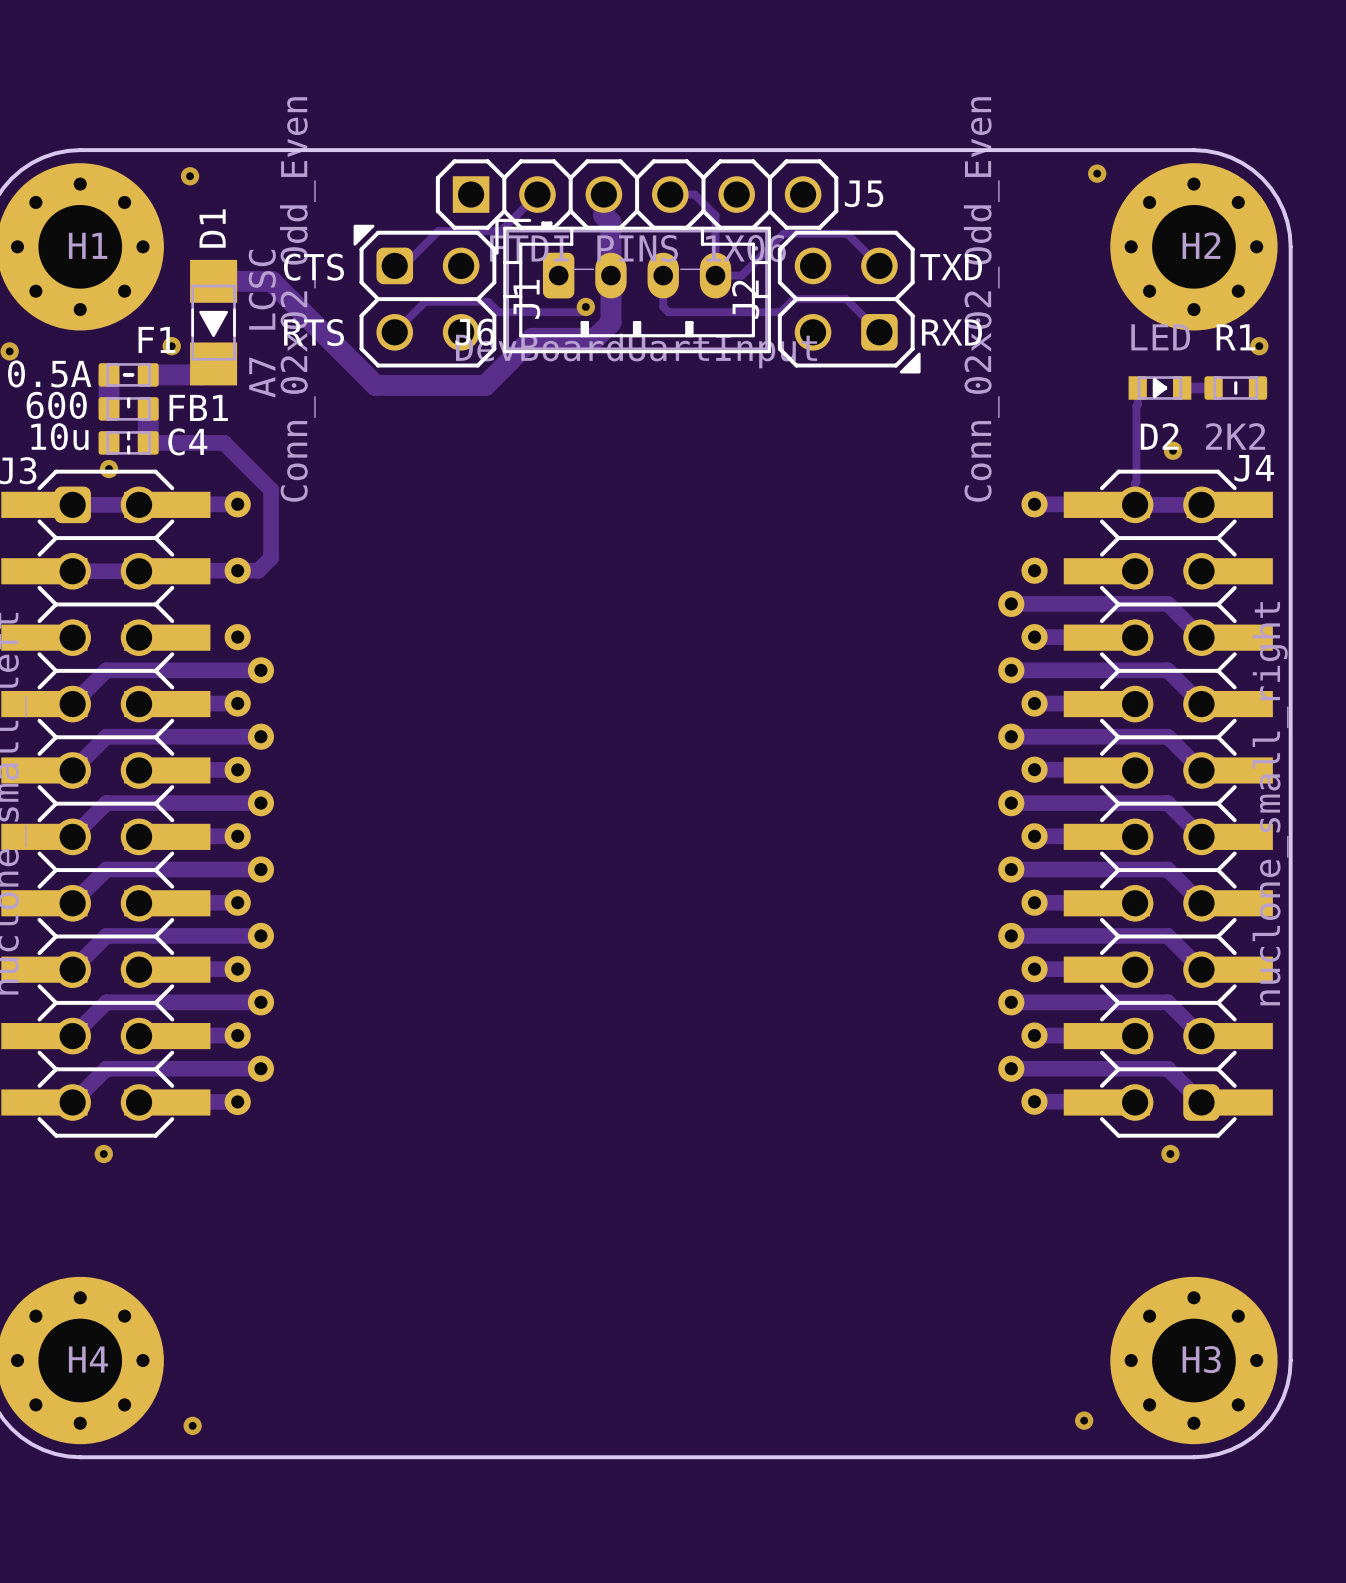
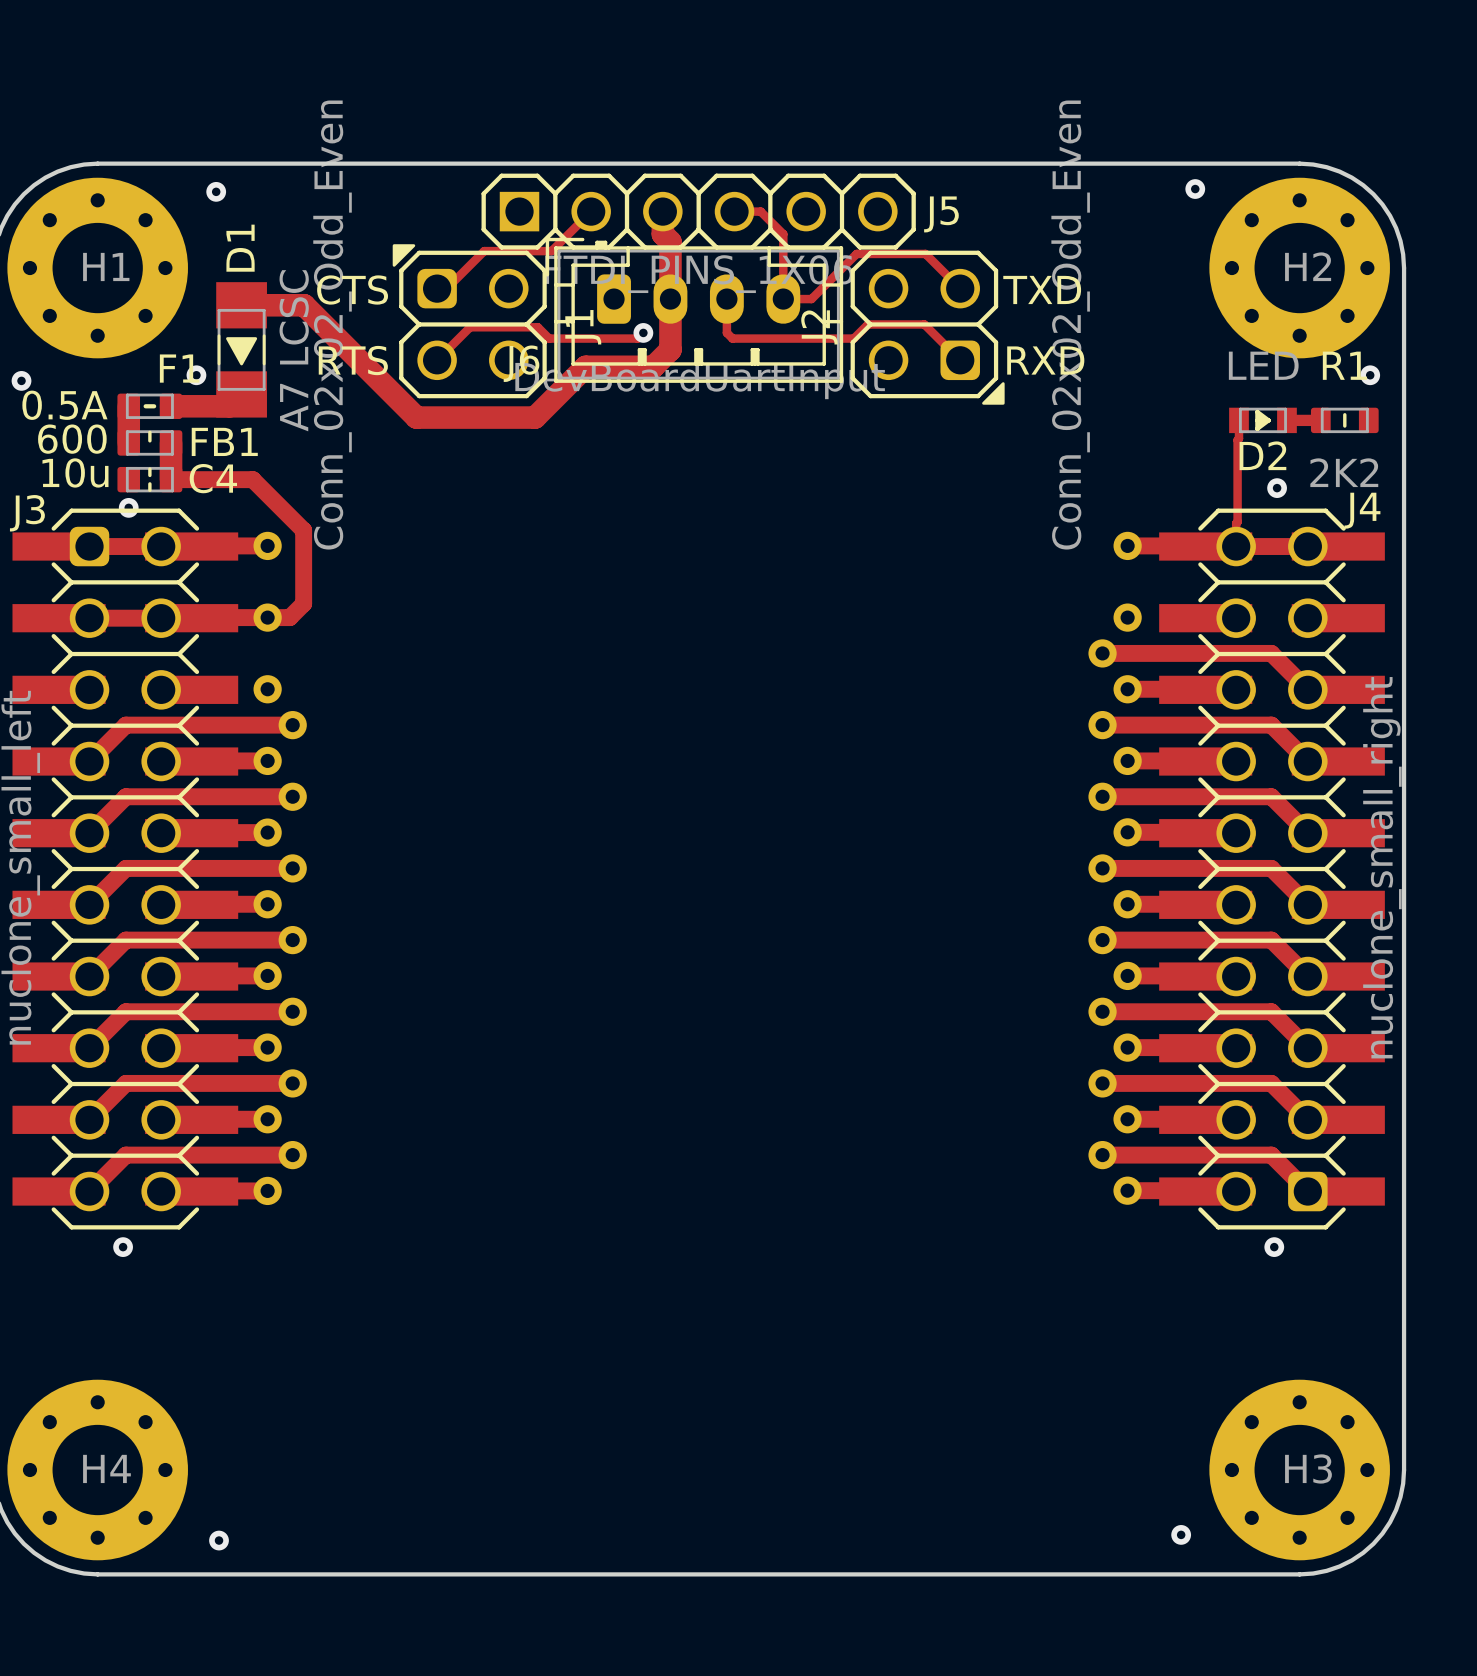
D2 name position: D2 (1159, 436) -> D2 (1262, 455)

